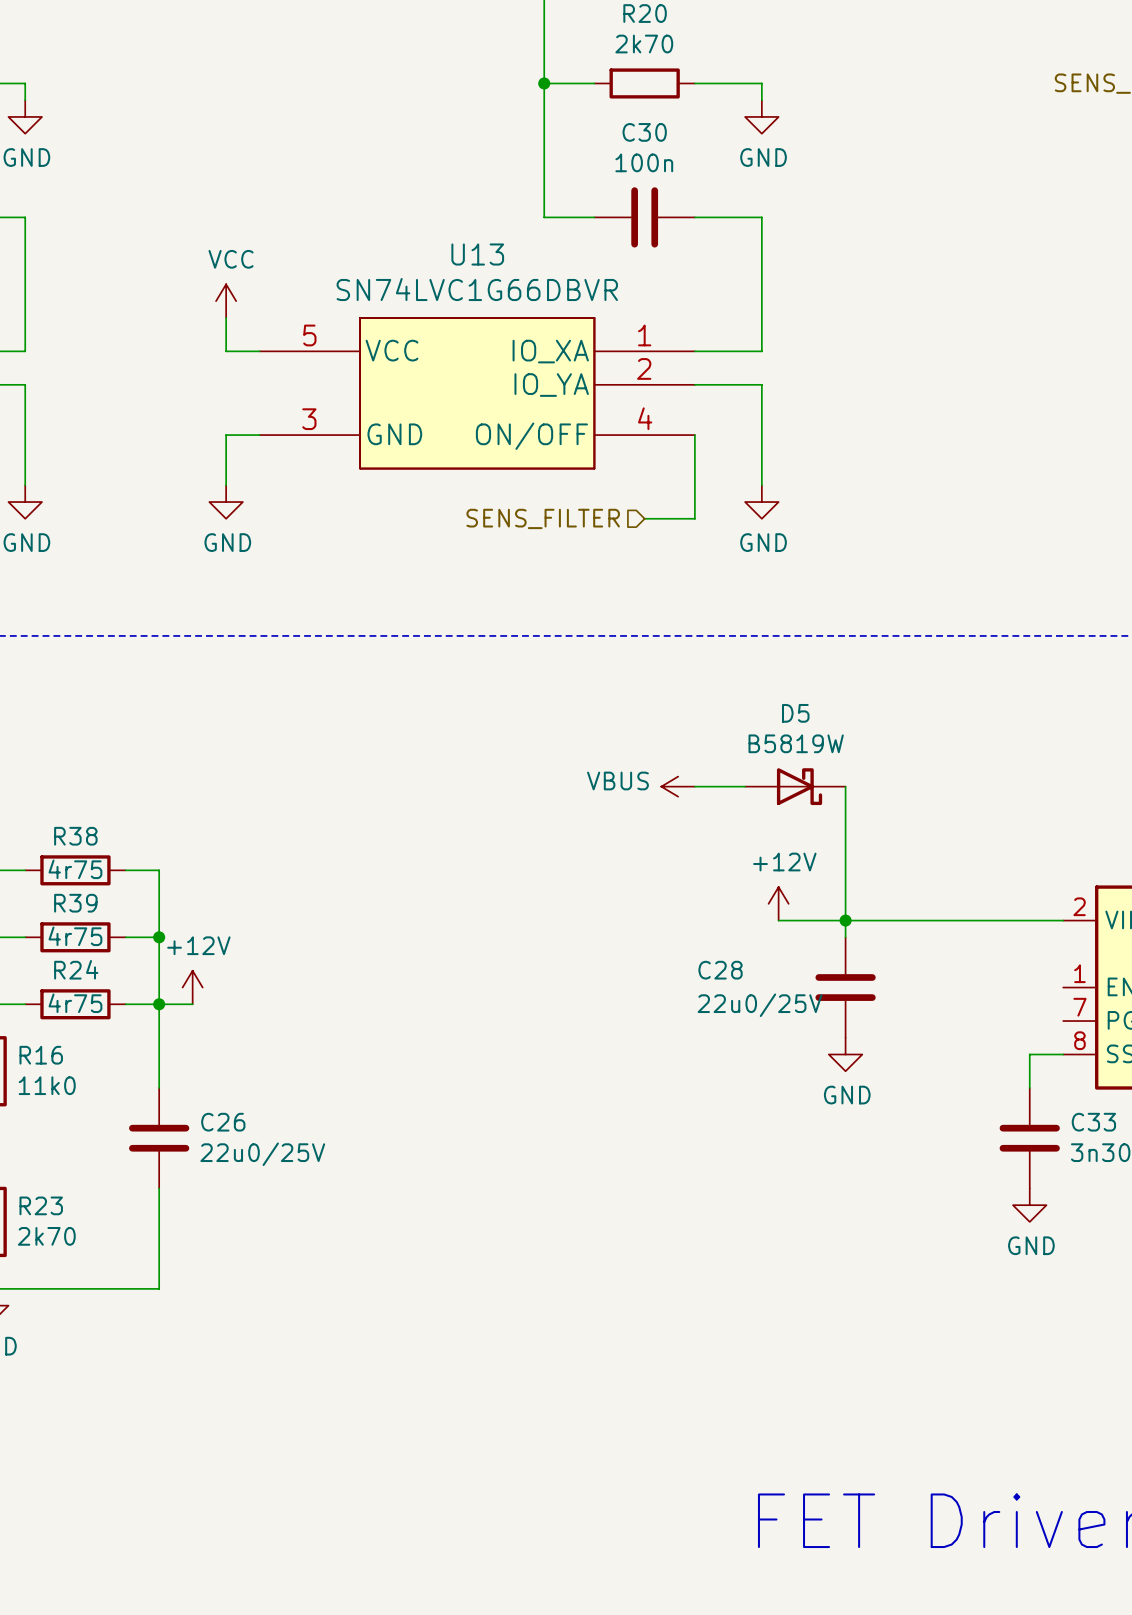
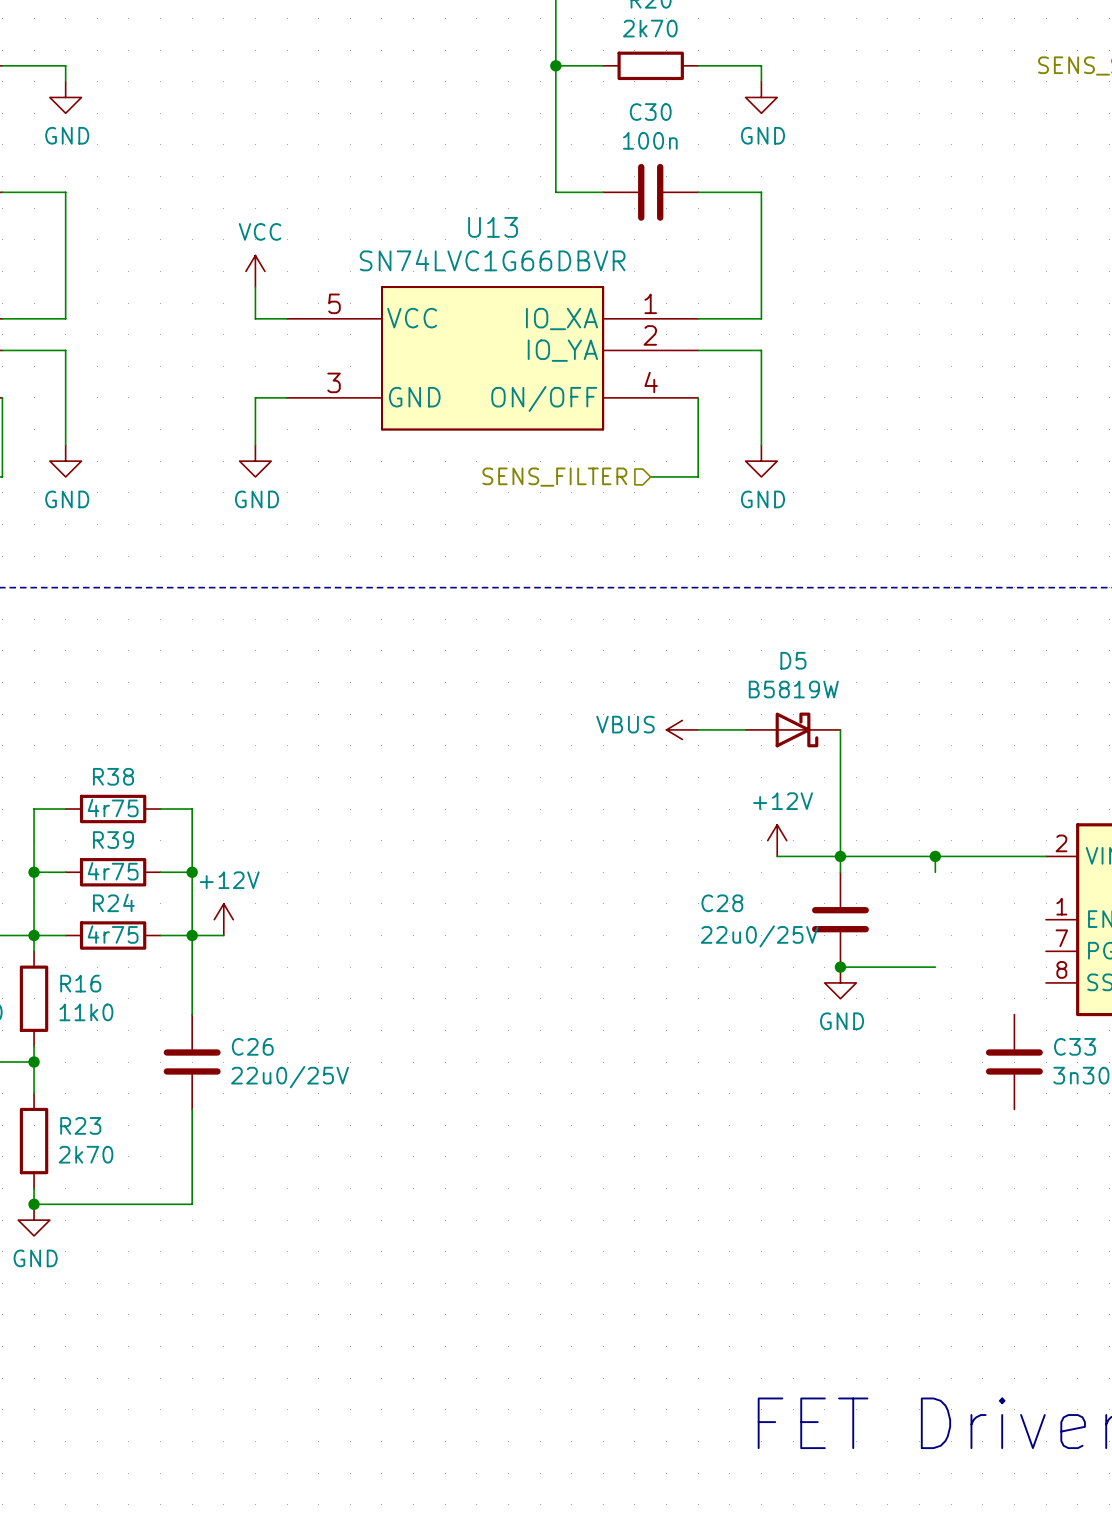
wire: none -> (935, 856) (935, 872)
junction: none -> (935, 856)
wire: none -> (840, 967) (935, 967)
junction: none -> (840, 967)
wire: (1063, 1054) (1029, 1054) (1029, 1087) -> none
power symbol: GND (1029, 1205) -> none

